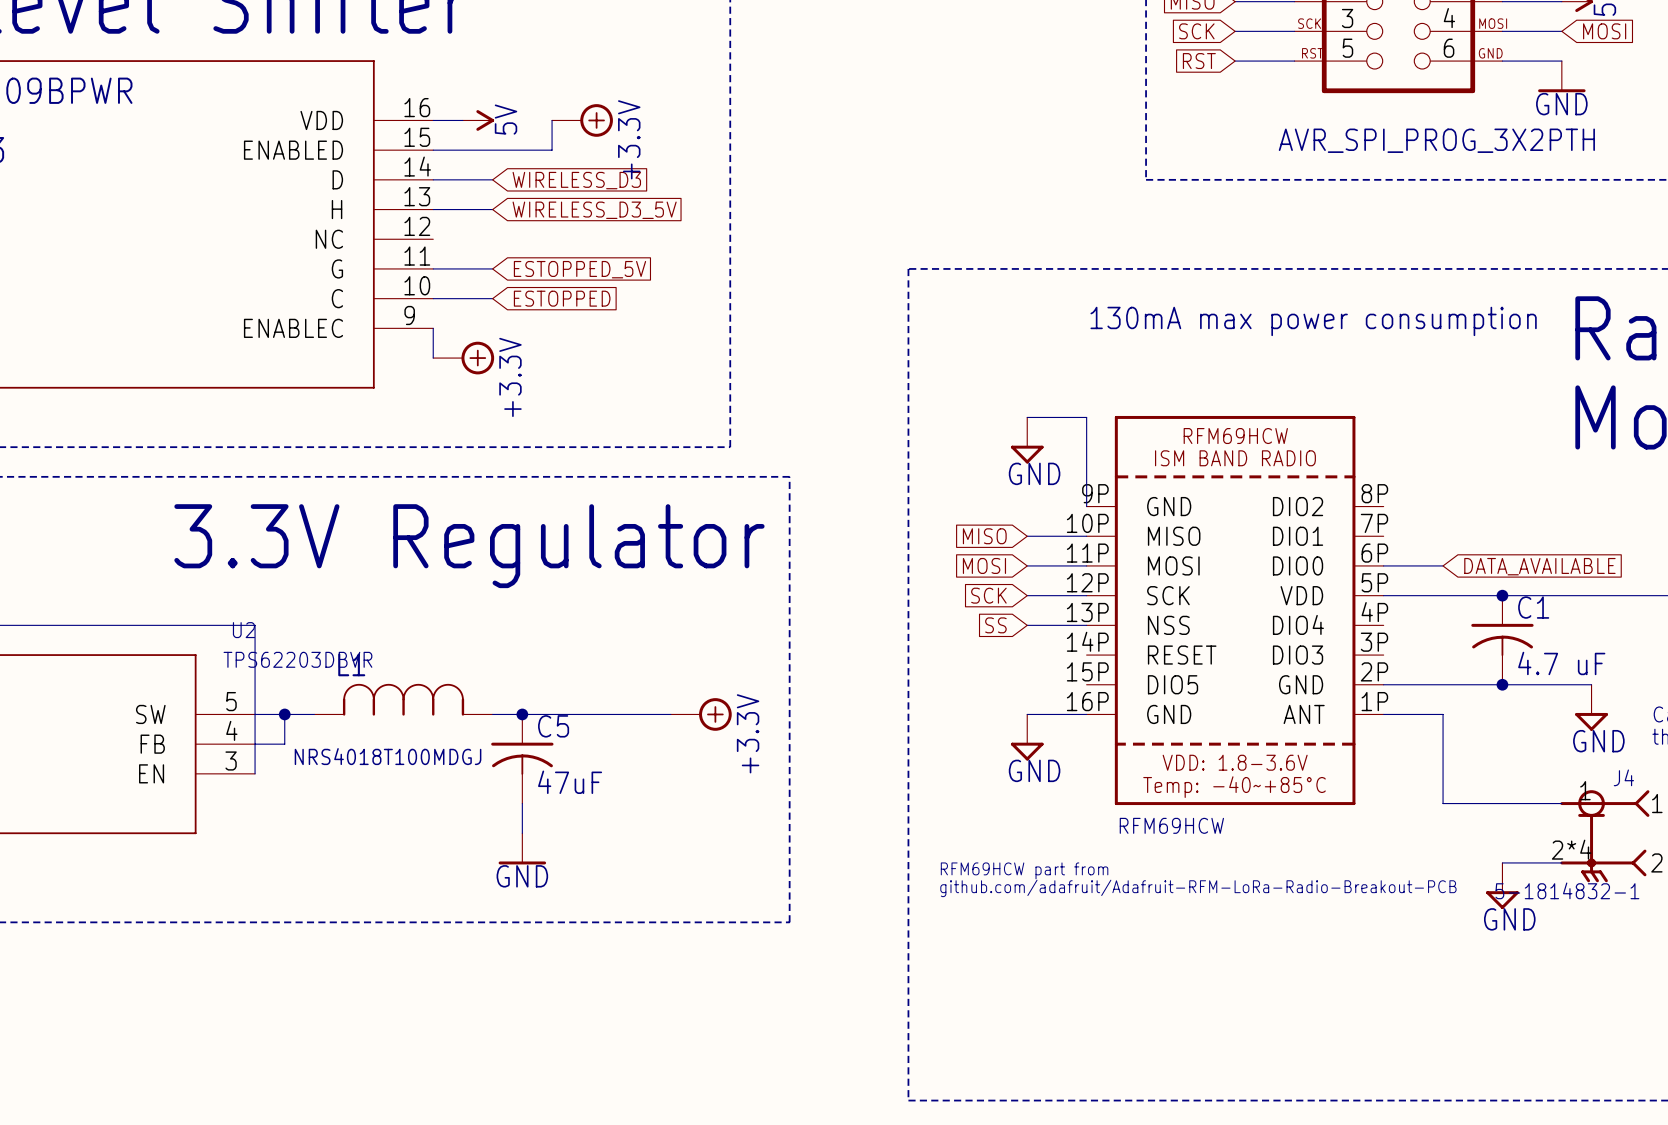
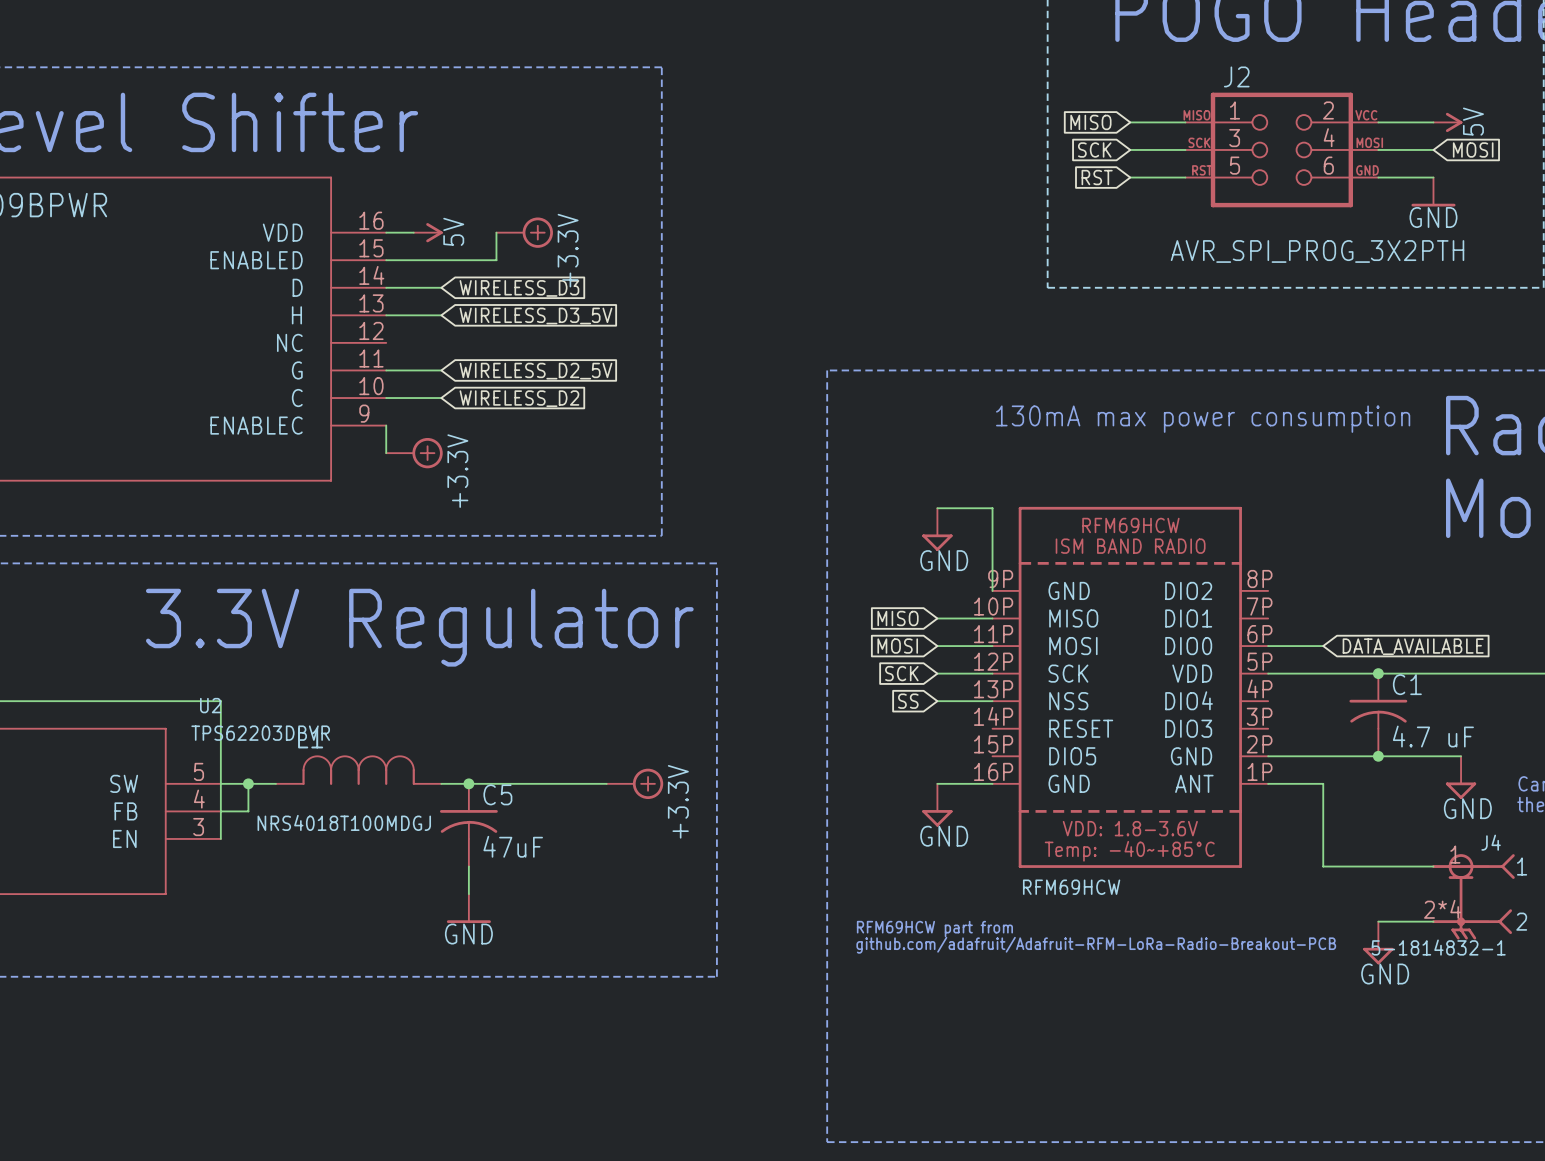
global label: ESTOPPED_5V (579, 269) -> WIRELESS_D2_5V (535, 371)
global label: ESTOPPED (562, 298) -> WIRELESS_D2 (519, 398)

